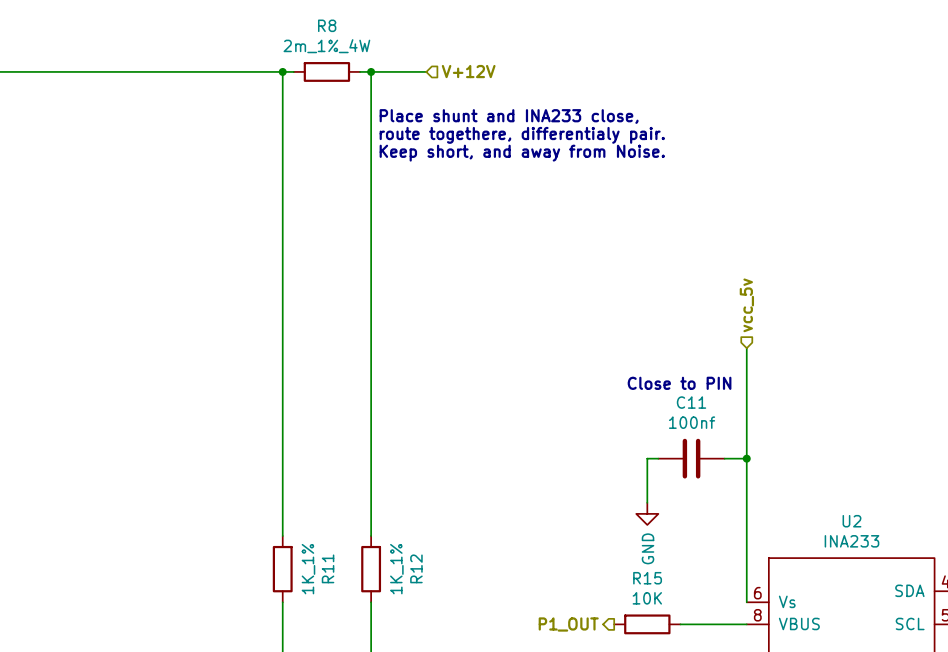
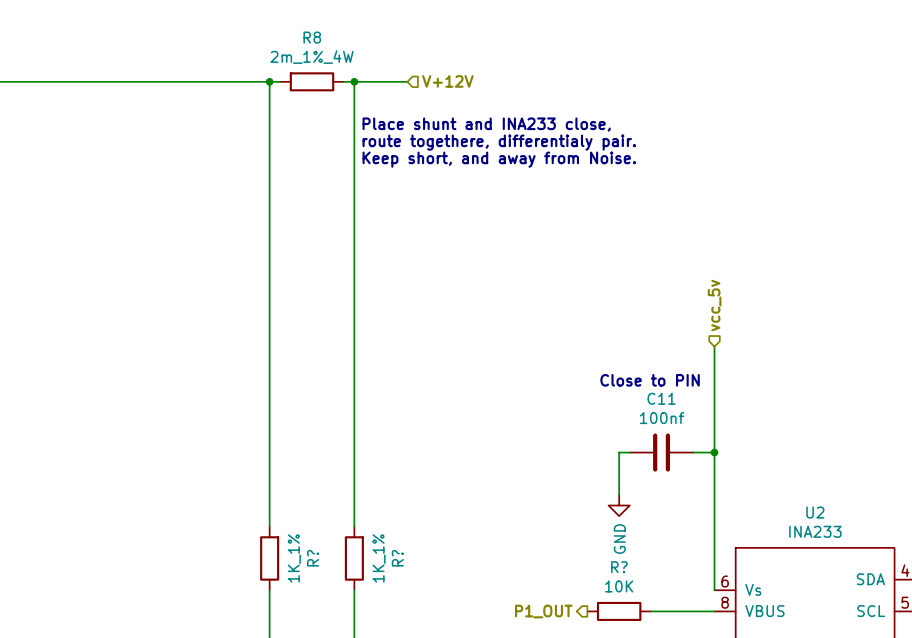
R11 name: R11 (328, 568) -> R? (313, 558)
R12 name: R12 (416, 568) -> R? (397, 558)
R15 name: R15 (647, 578) -> R? (619, 567)

